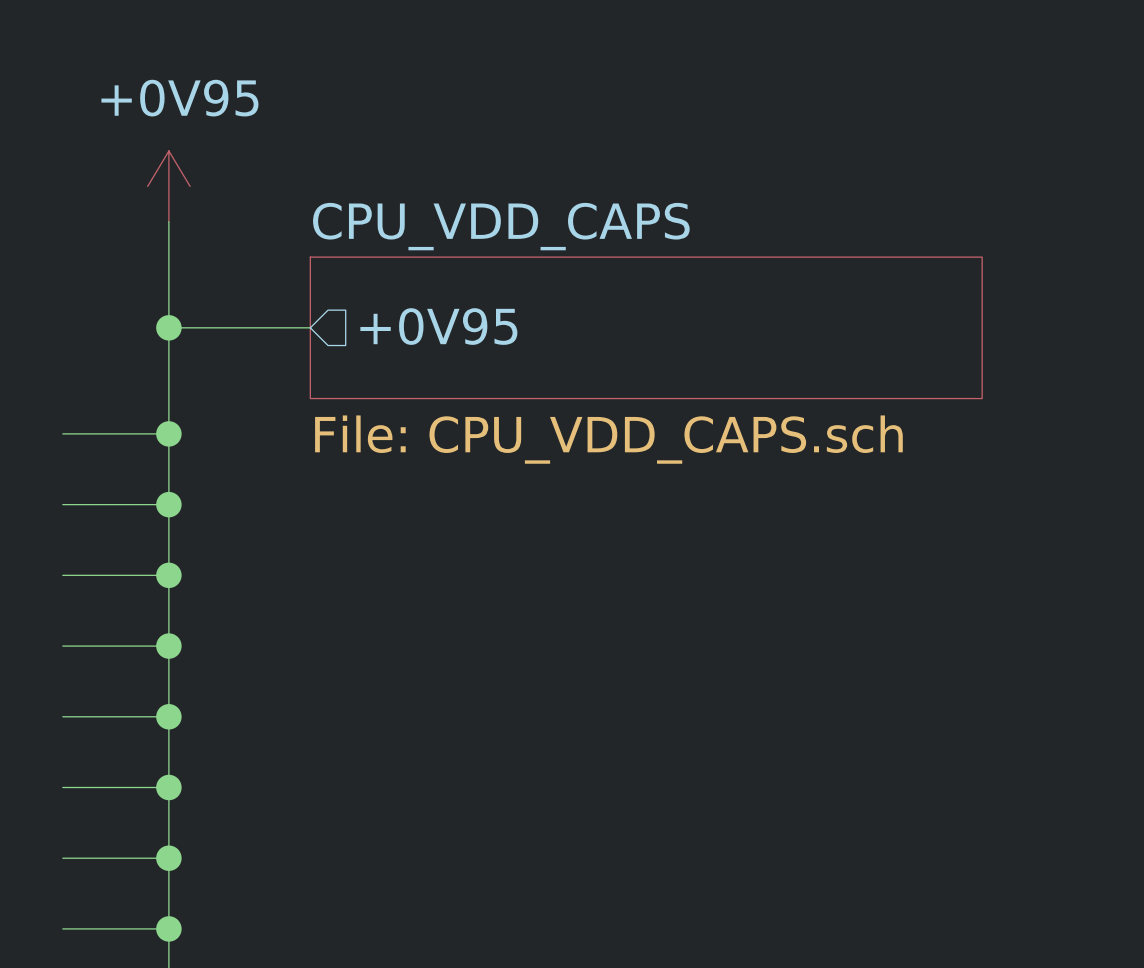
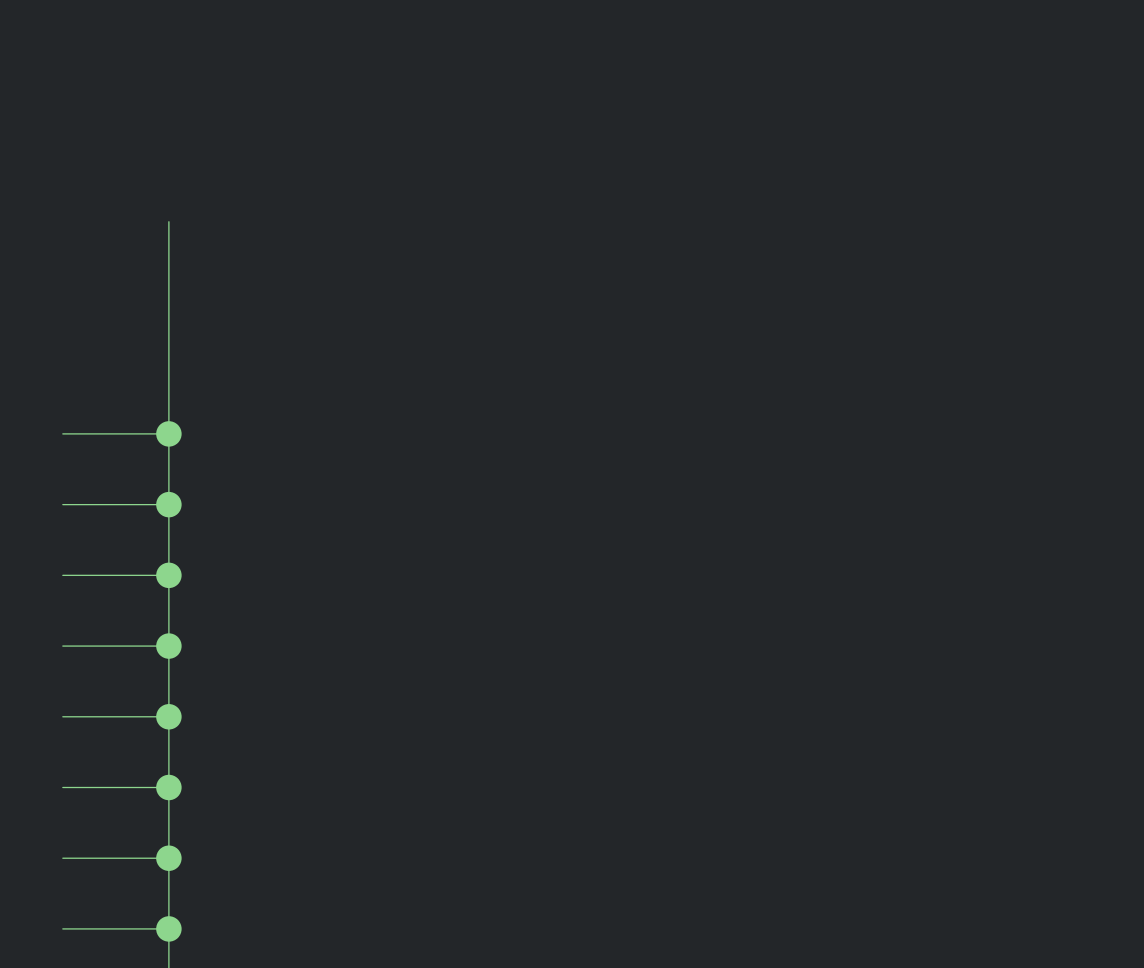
power symbol: +0V95 (168, 186) -> none
sheet pin: +0V95 (438, 326) -> none
wire: (168, 327) (310, 327) -> none
junction: (168, 327) -> none
sheet CPU_VDD_CAPS: File: CPU_VDD_CAPS.sch (646, 327) -> none

